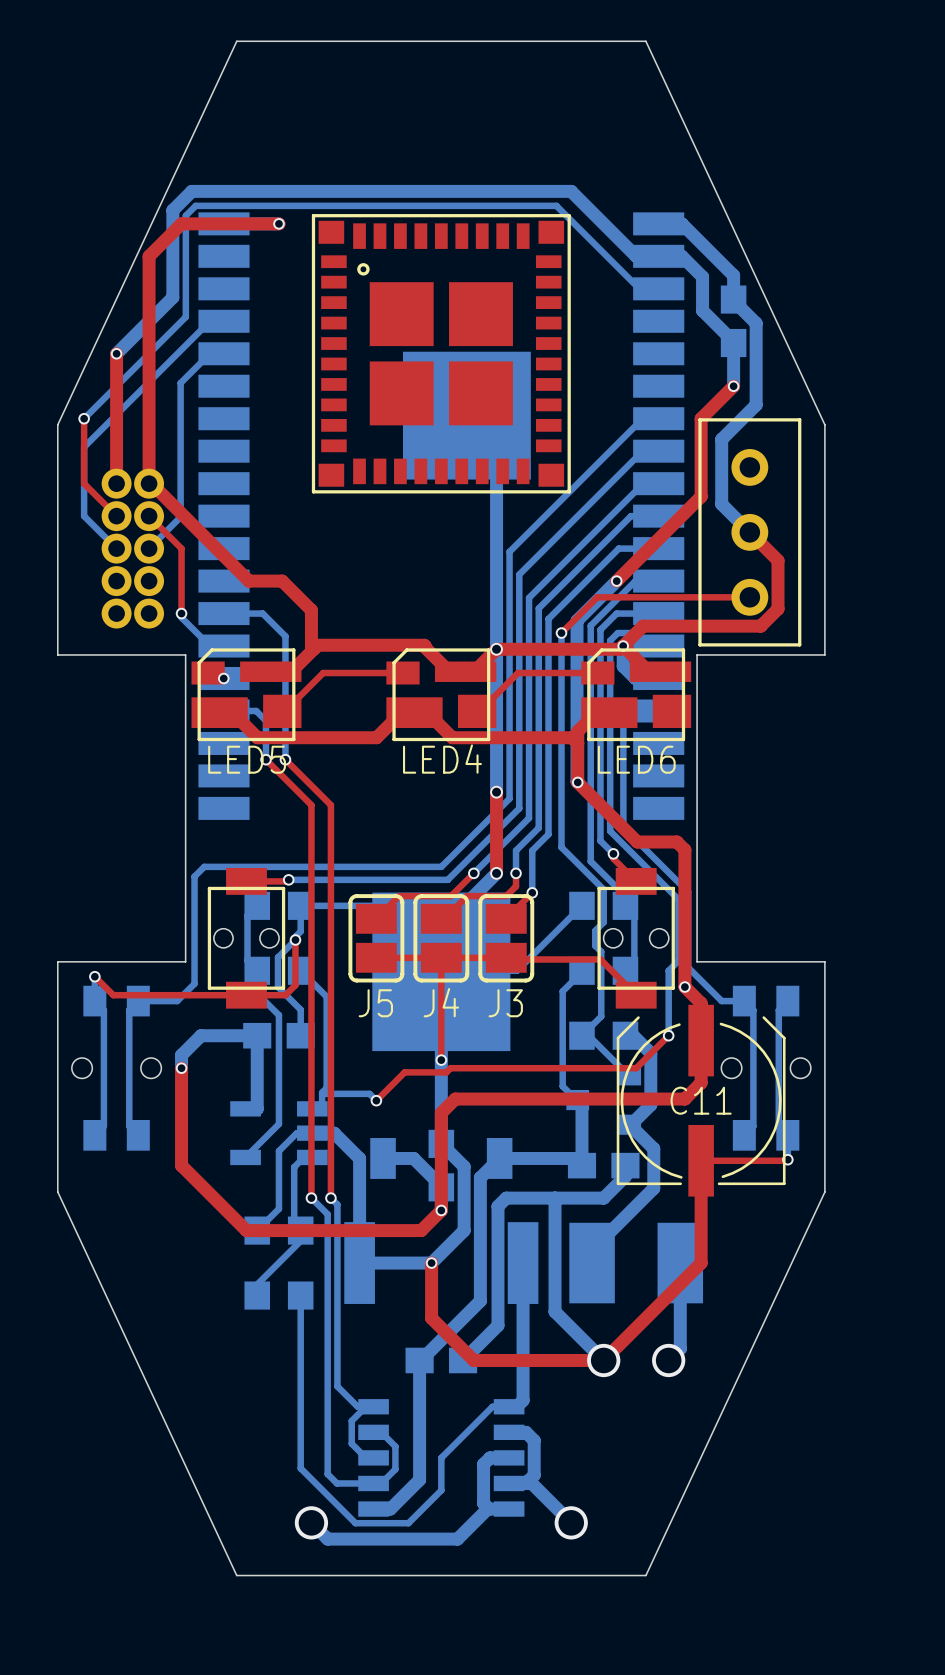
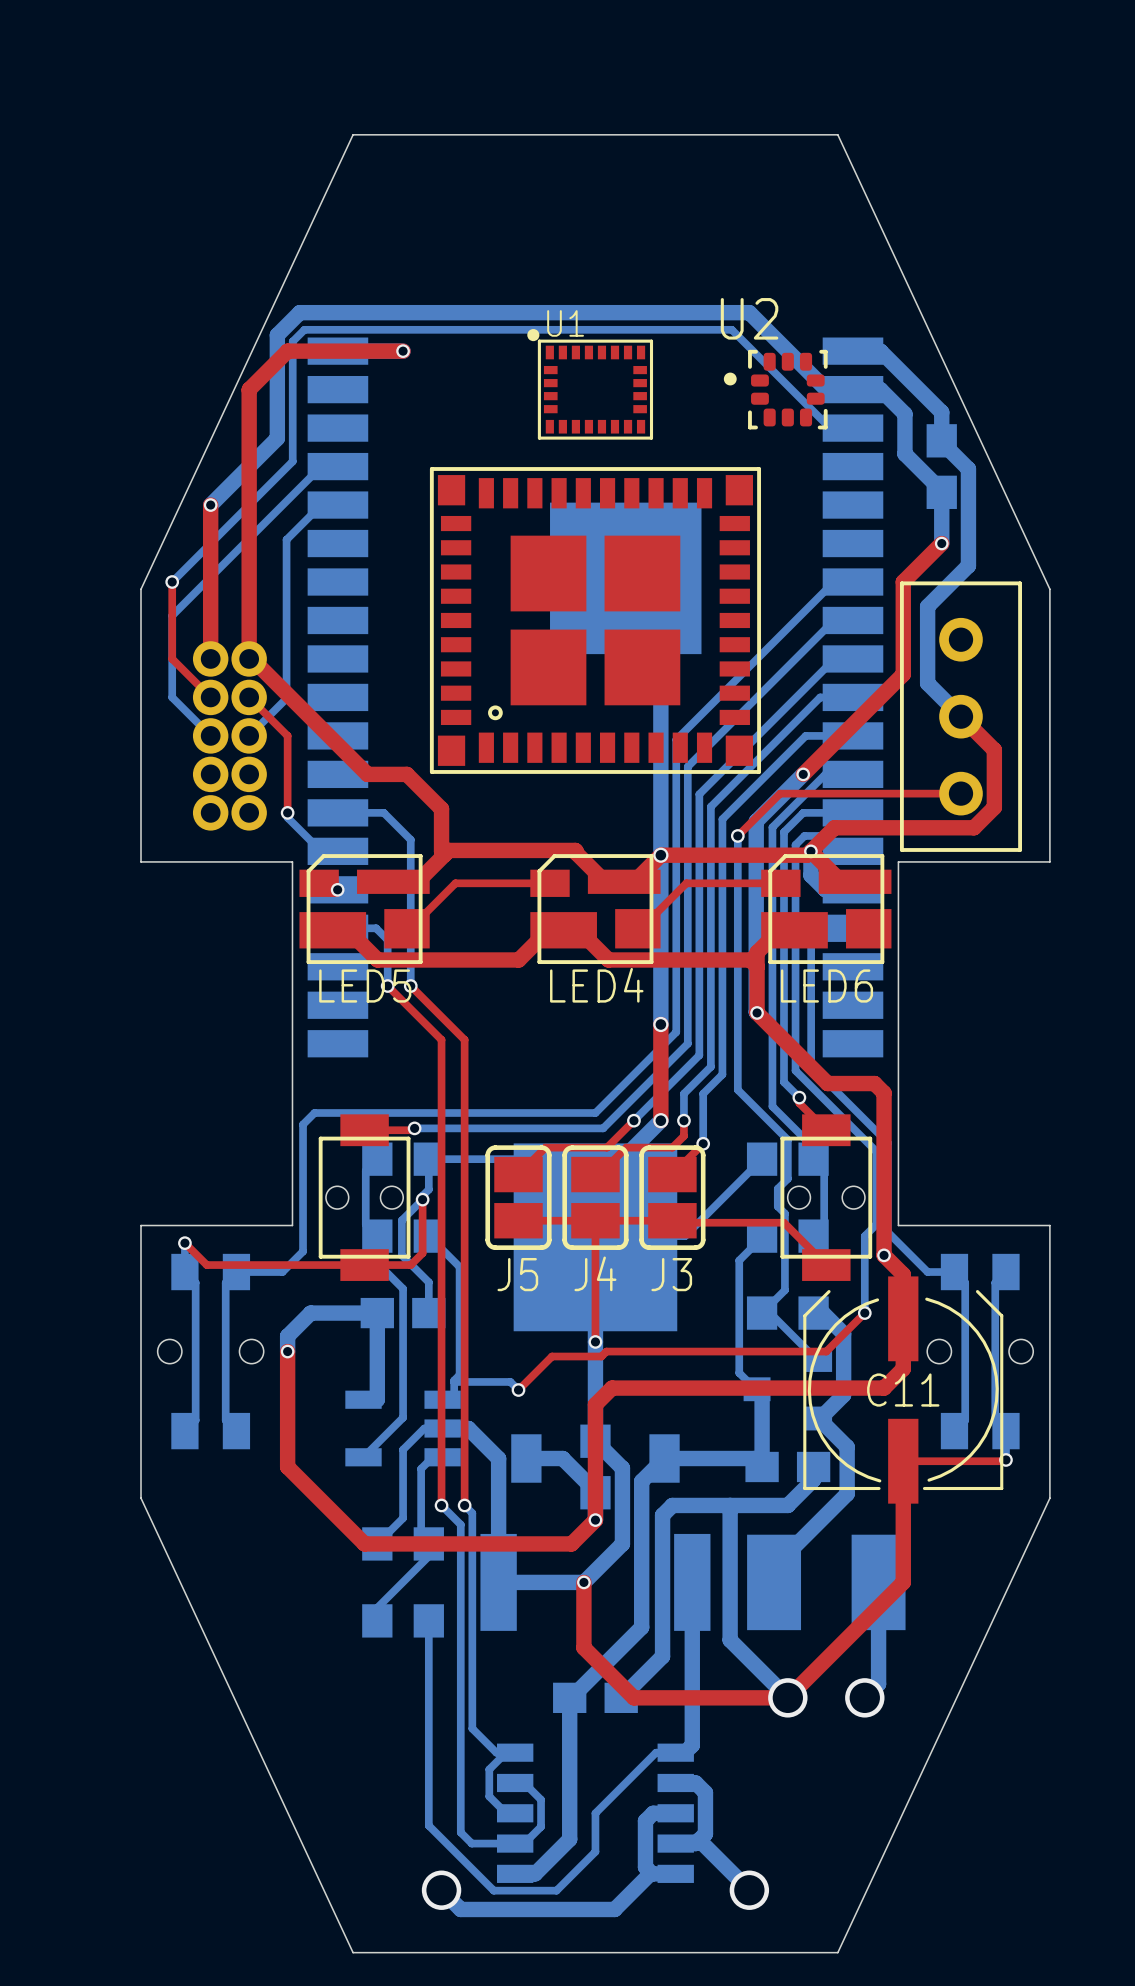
U1: none -> (590, 384)
U2: none -> (775, 389)
part rotation: 0° (441, 353) -> 90° counterclockwise (595, 620)

